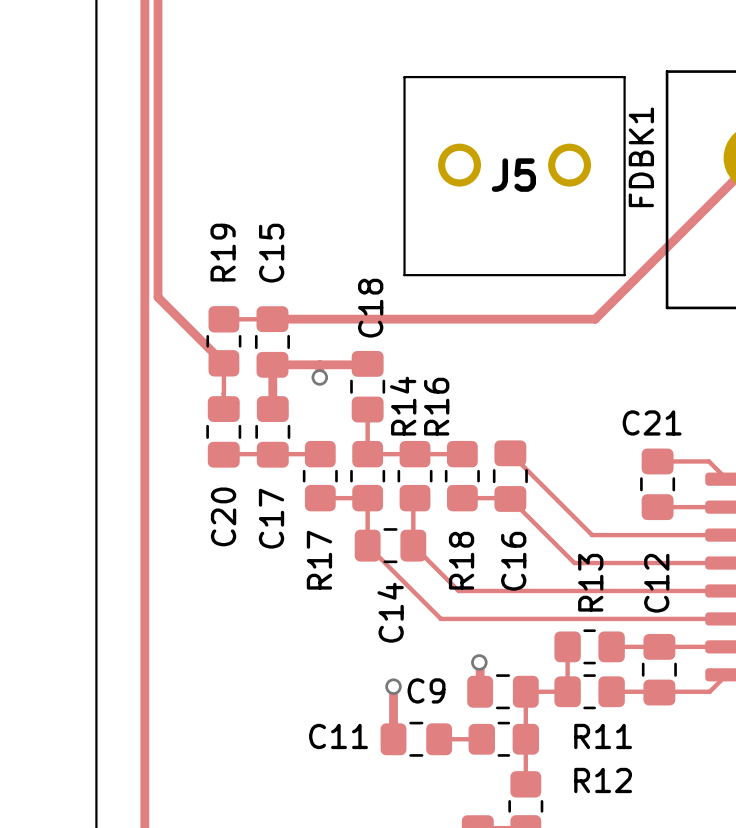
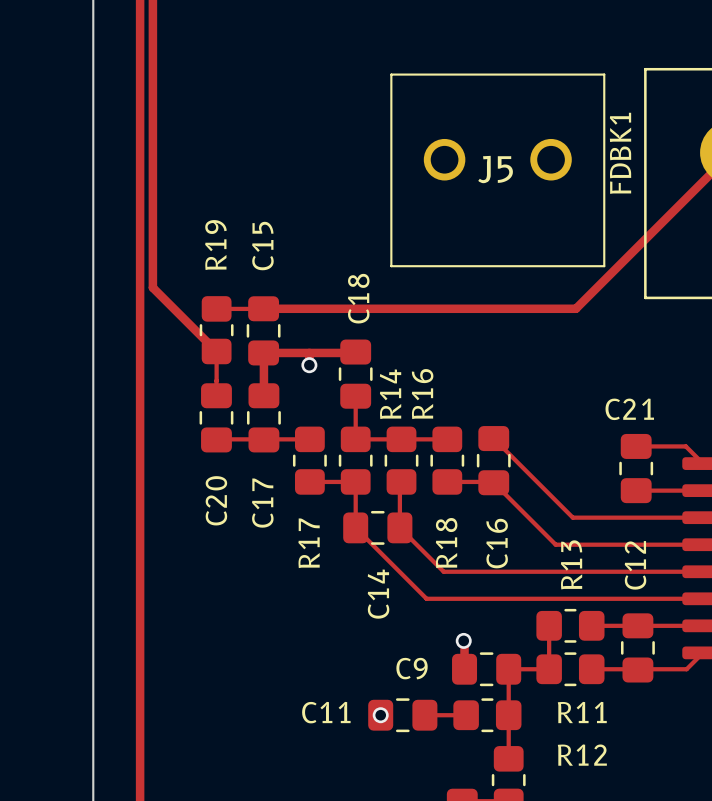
track: (393, 686) (393, 739) -> none
via position: (393, 686) -> (380, 715)

